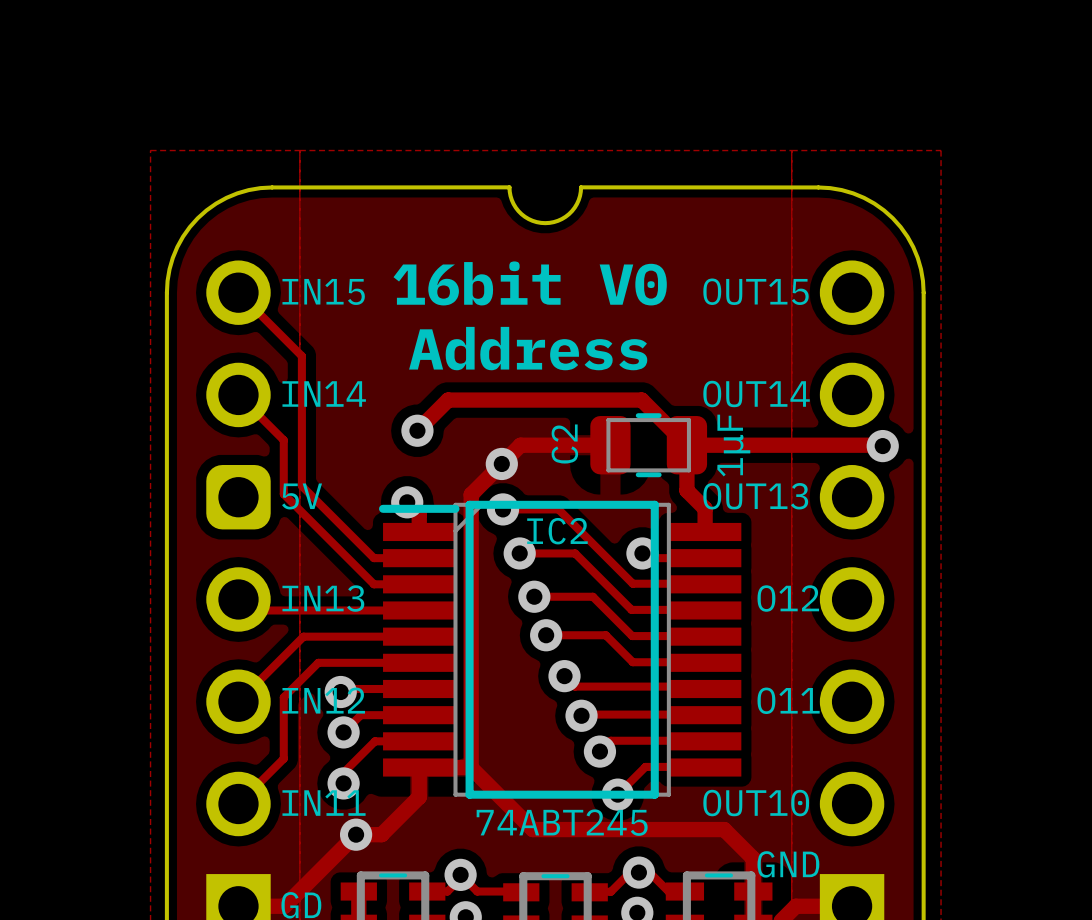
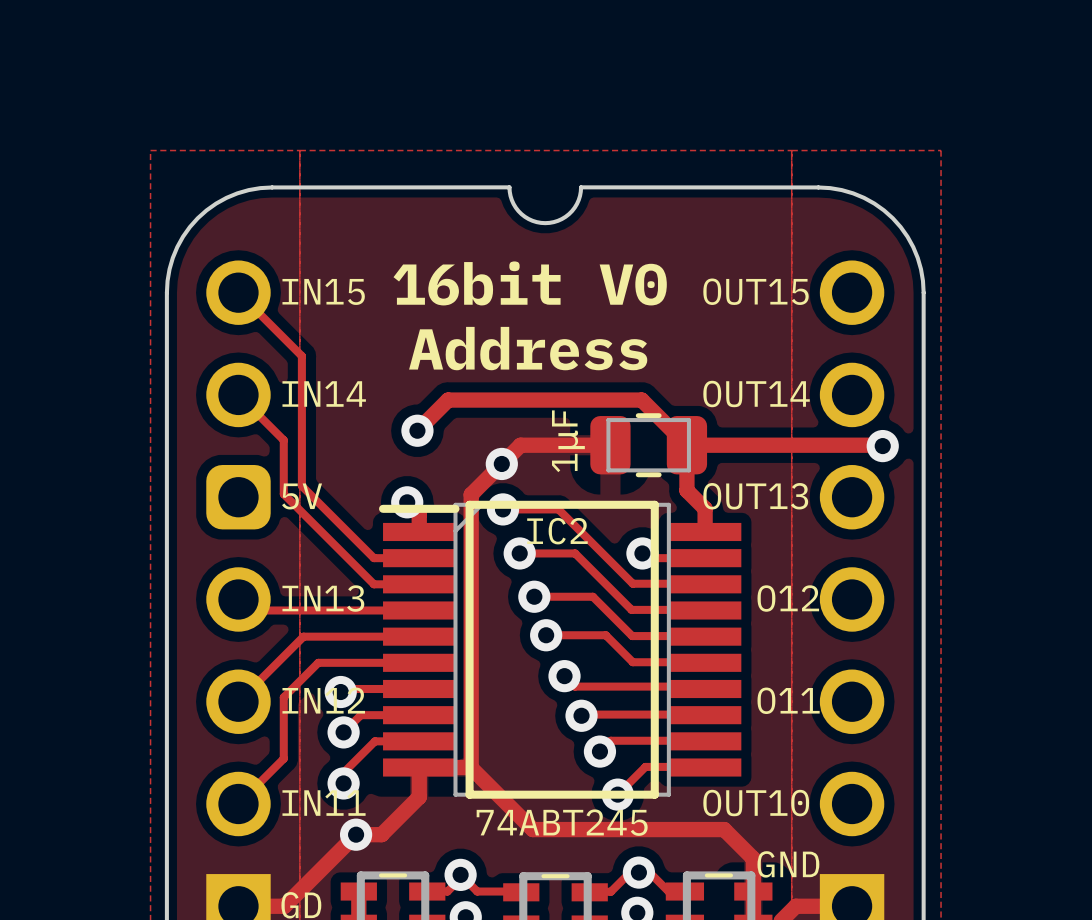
C2 name: C2 (564, 444) -> none
C2 value position: 1μF (733, 445) -> 1μF (568, 441)

